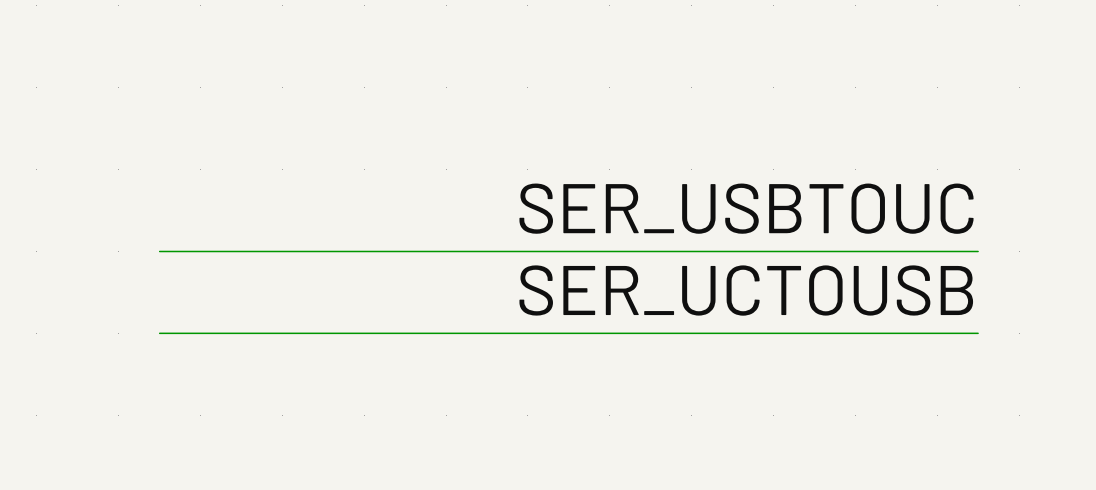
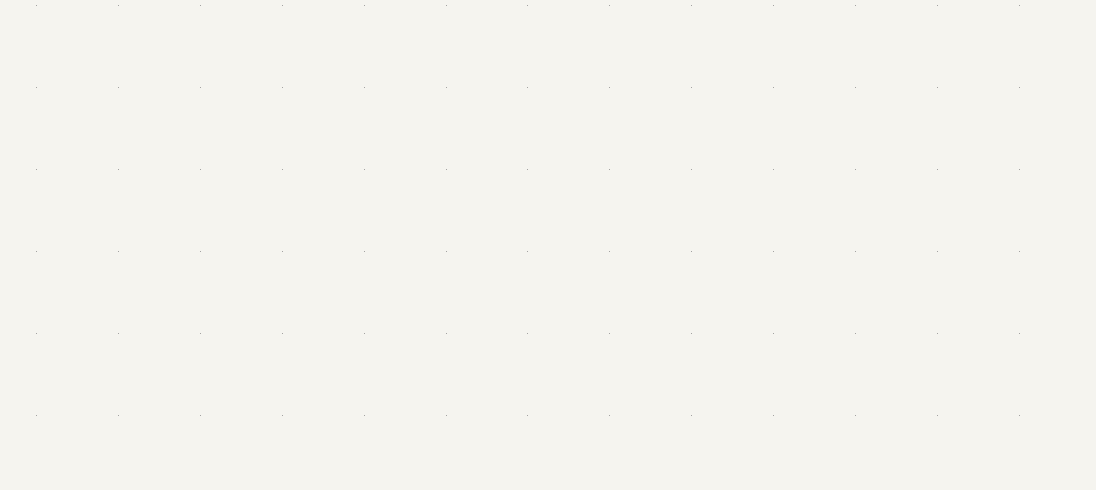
label: SER_USBTOUC (746, 208) -> none
wire: (159, 251) (978, 251) -> none
label: SER_UCTOUSB (746, 290) -> none
wire: (159, 333) (978, 333) -> none

